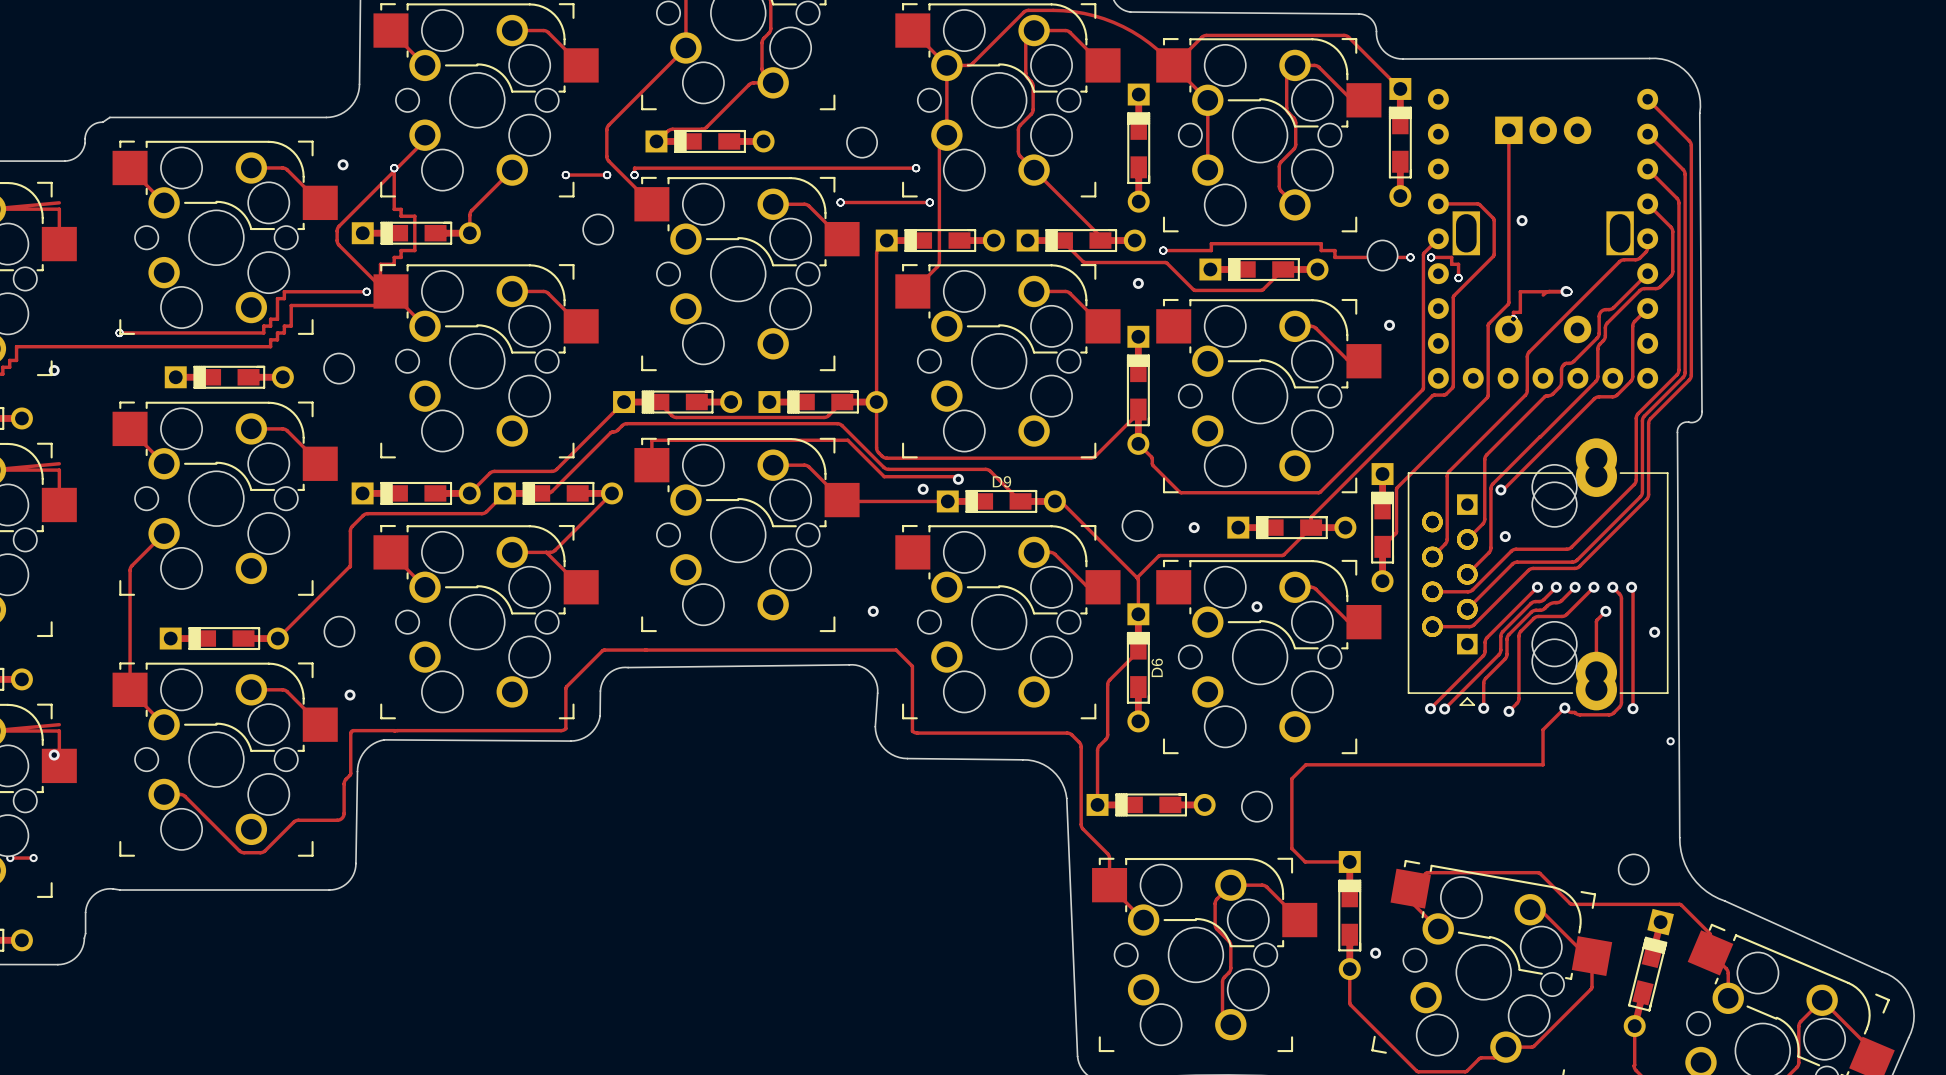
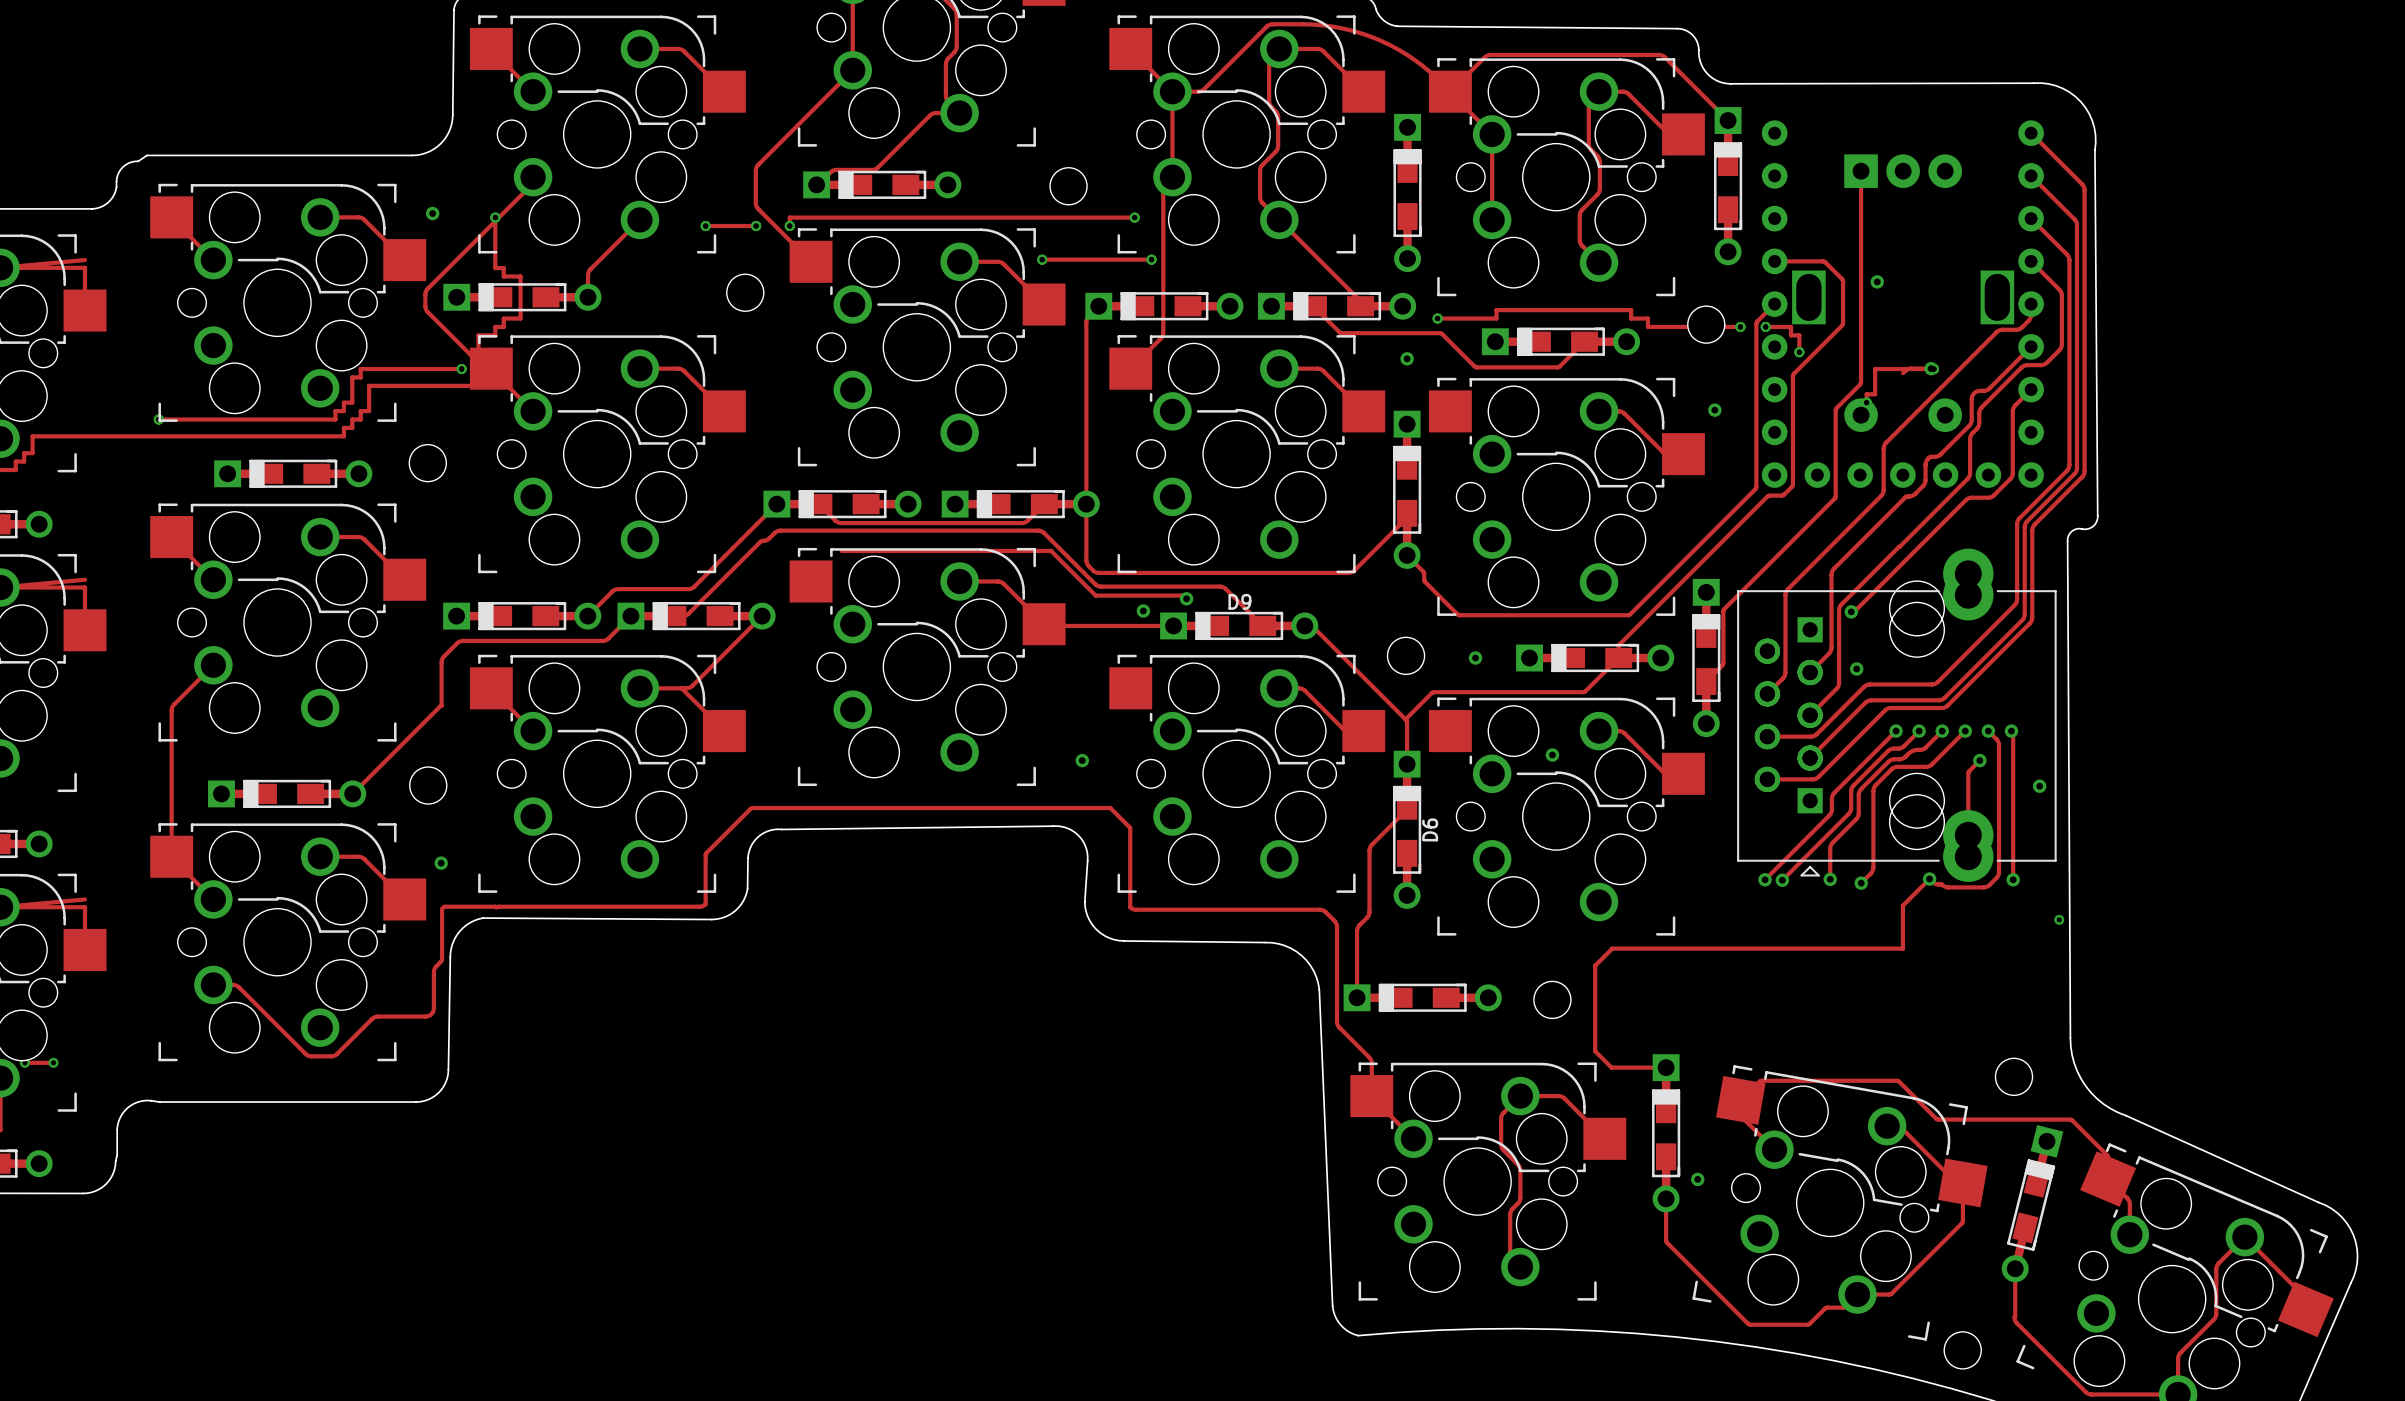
via: (54, 370) -> none
track: (676, 440) (651, 440) (651, 465) -> none
via: (54, 755) -> none

